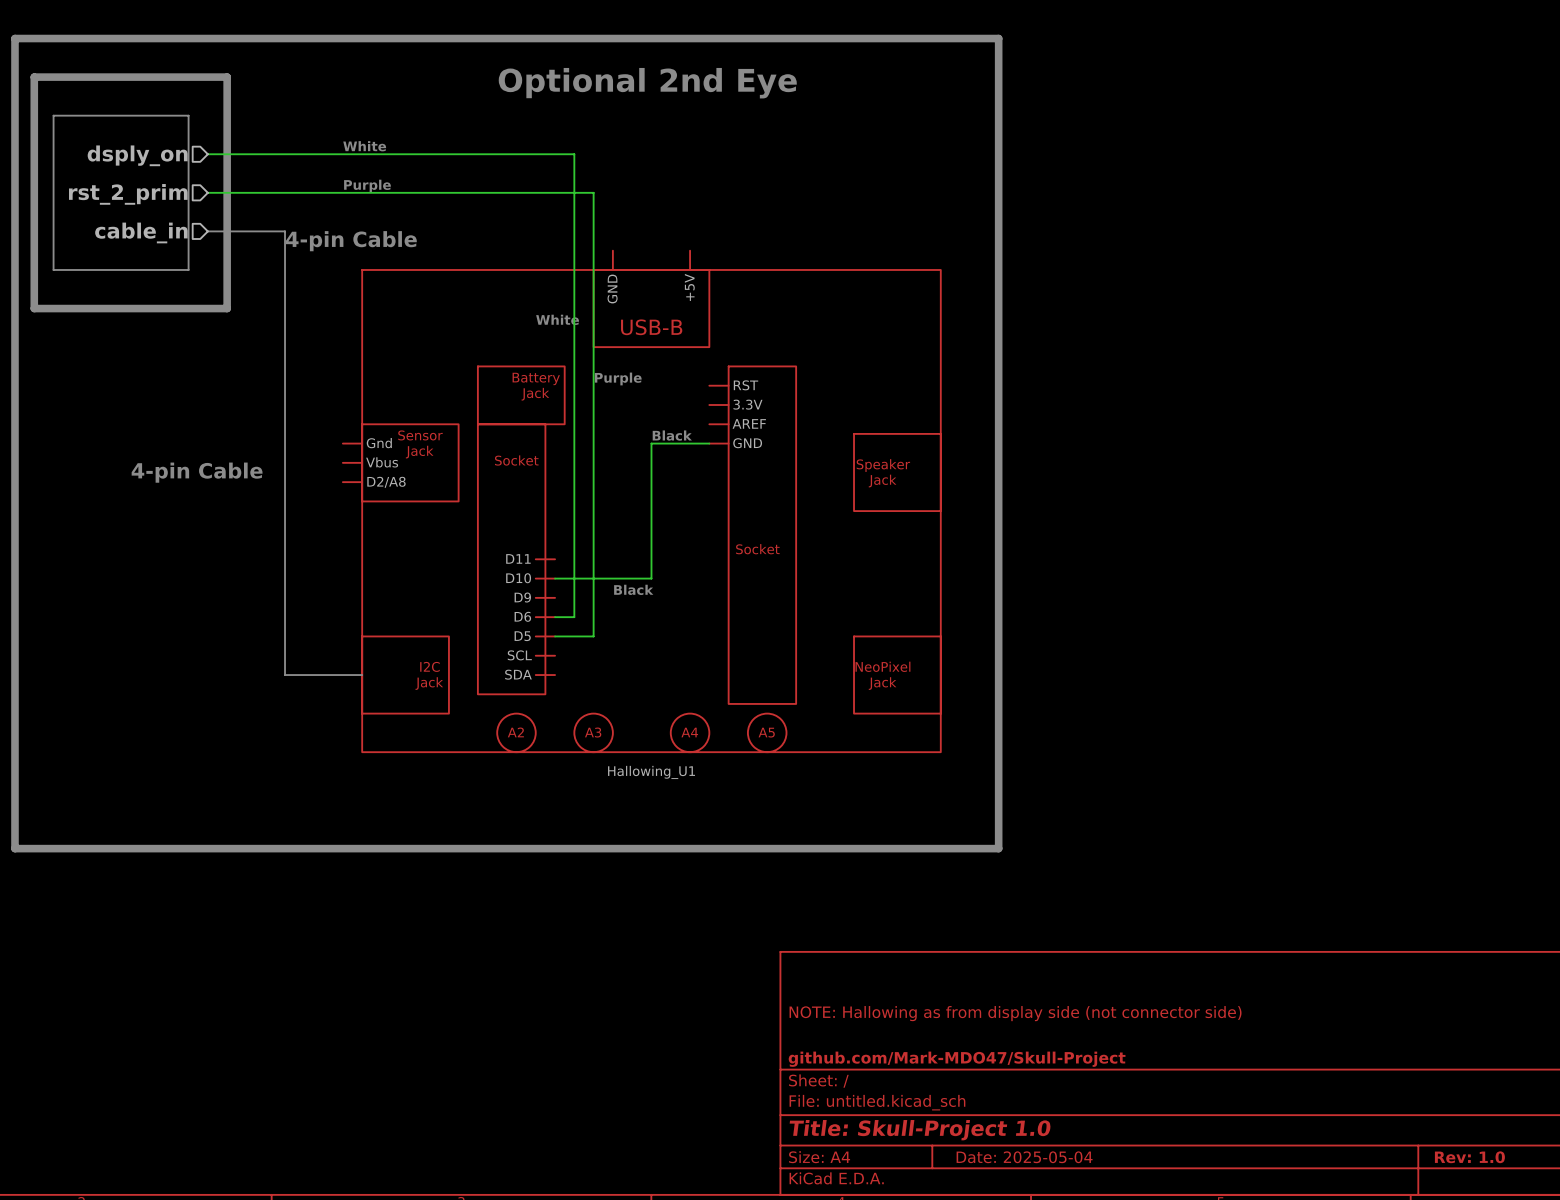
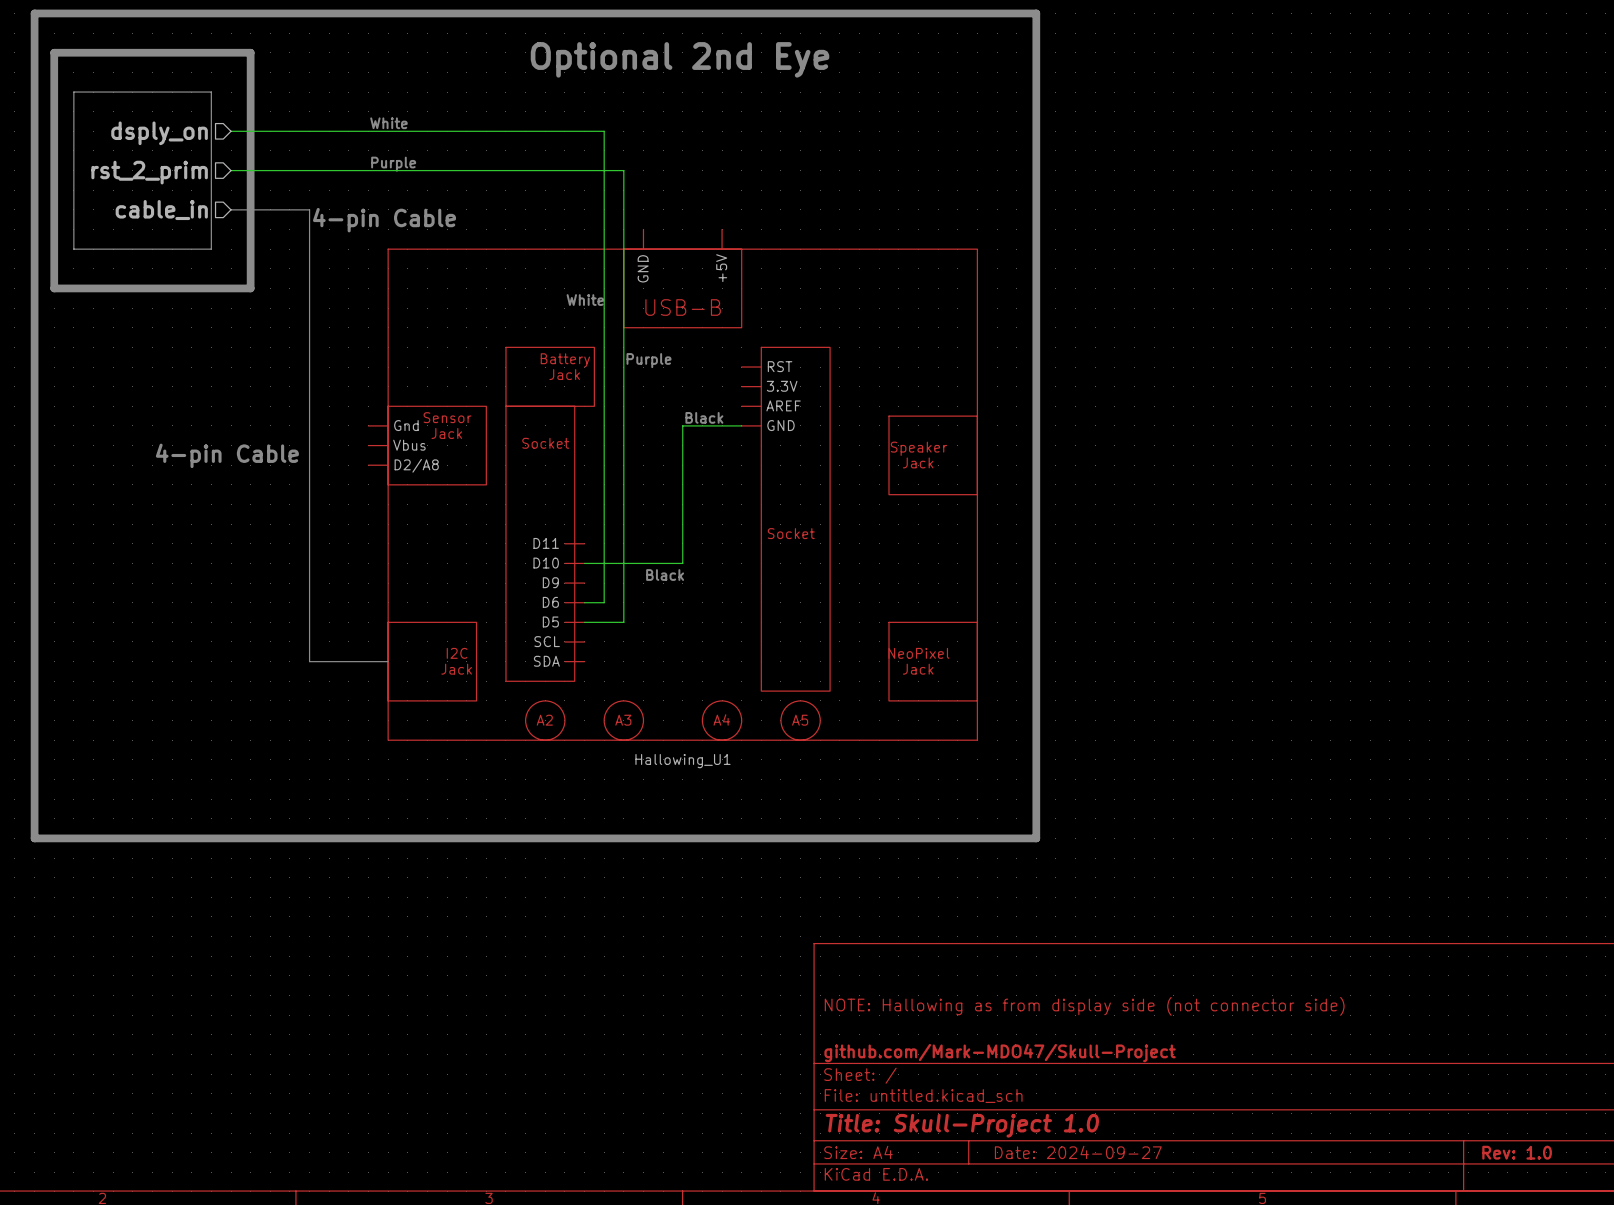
title block: Date: 2025-05-04 (1024, 1157) -> Date: 2024-09-27 (1078, 1152)

